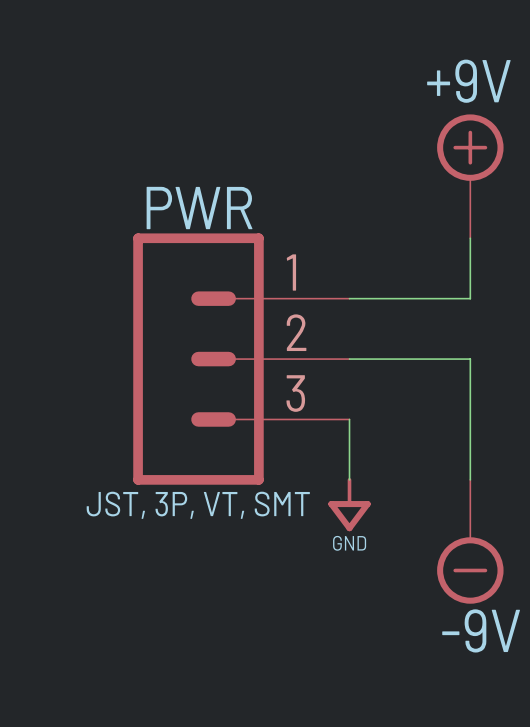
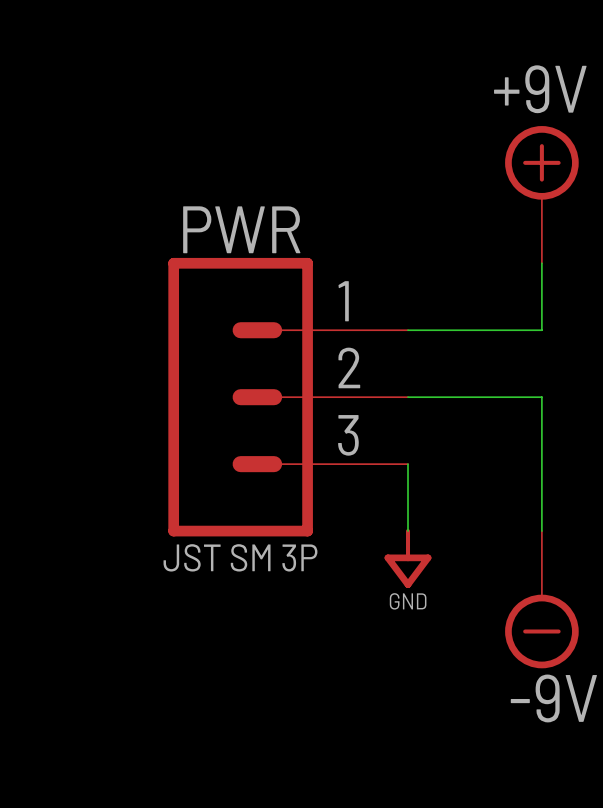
PWR value: JST, 3P, VT, SMT (198, 505) -> JST SM 3P (240, 557)

